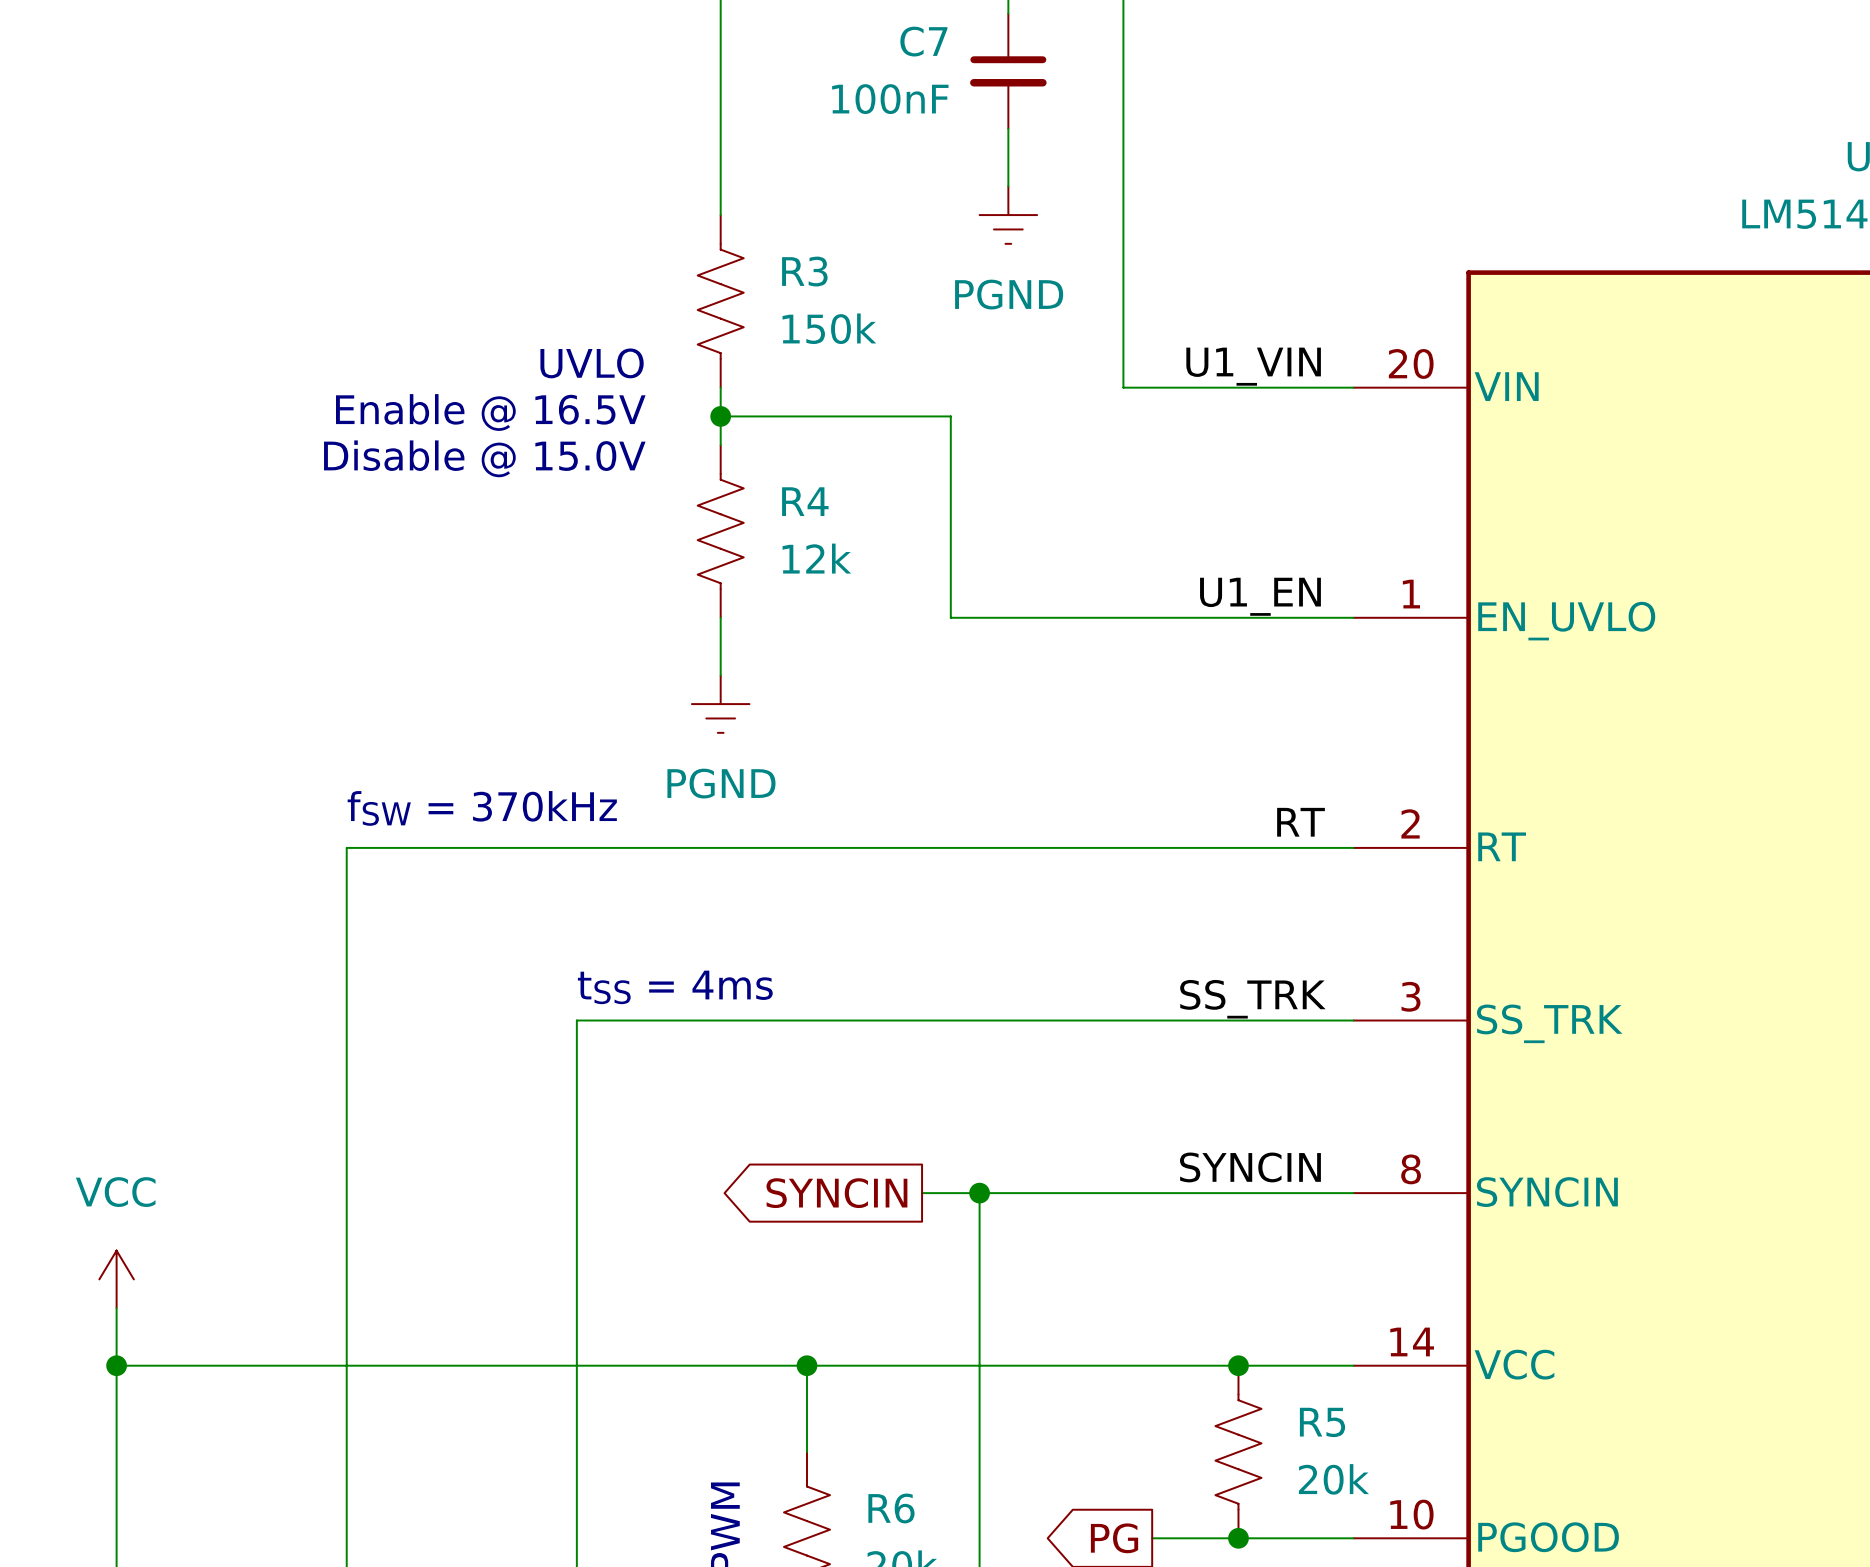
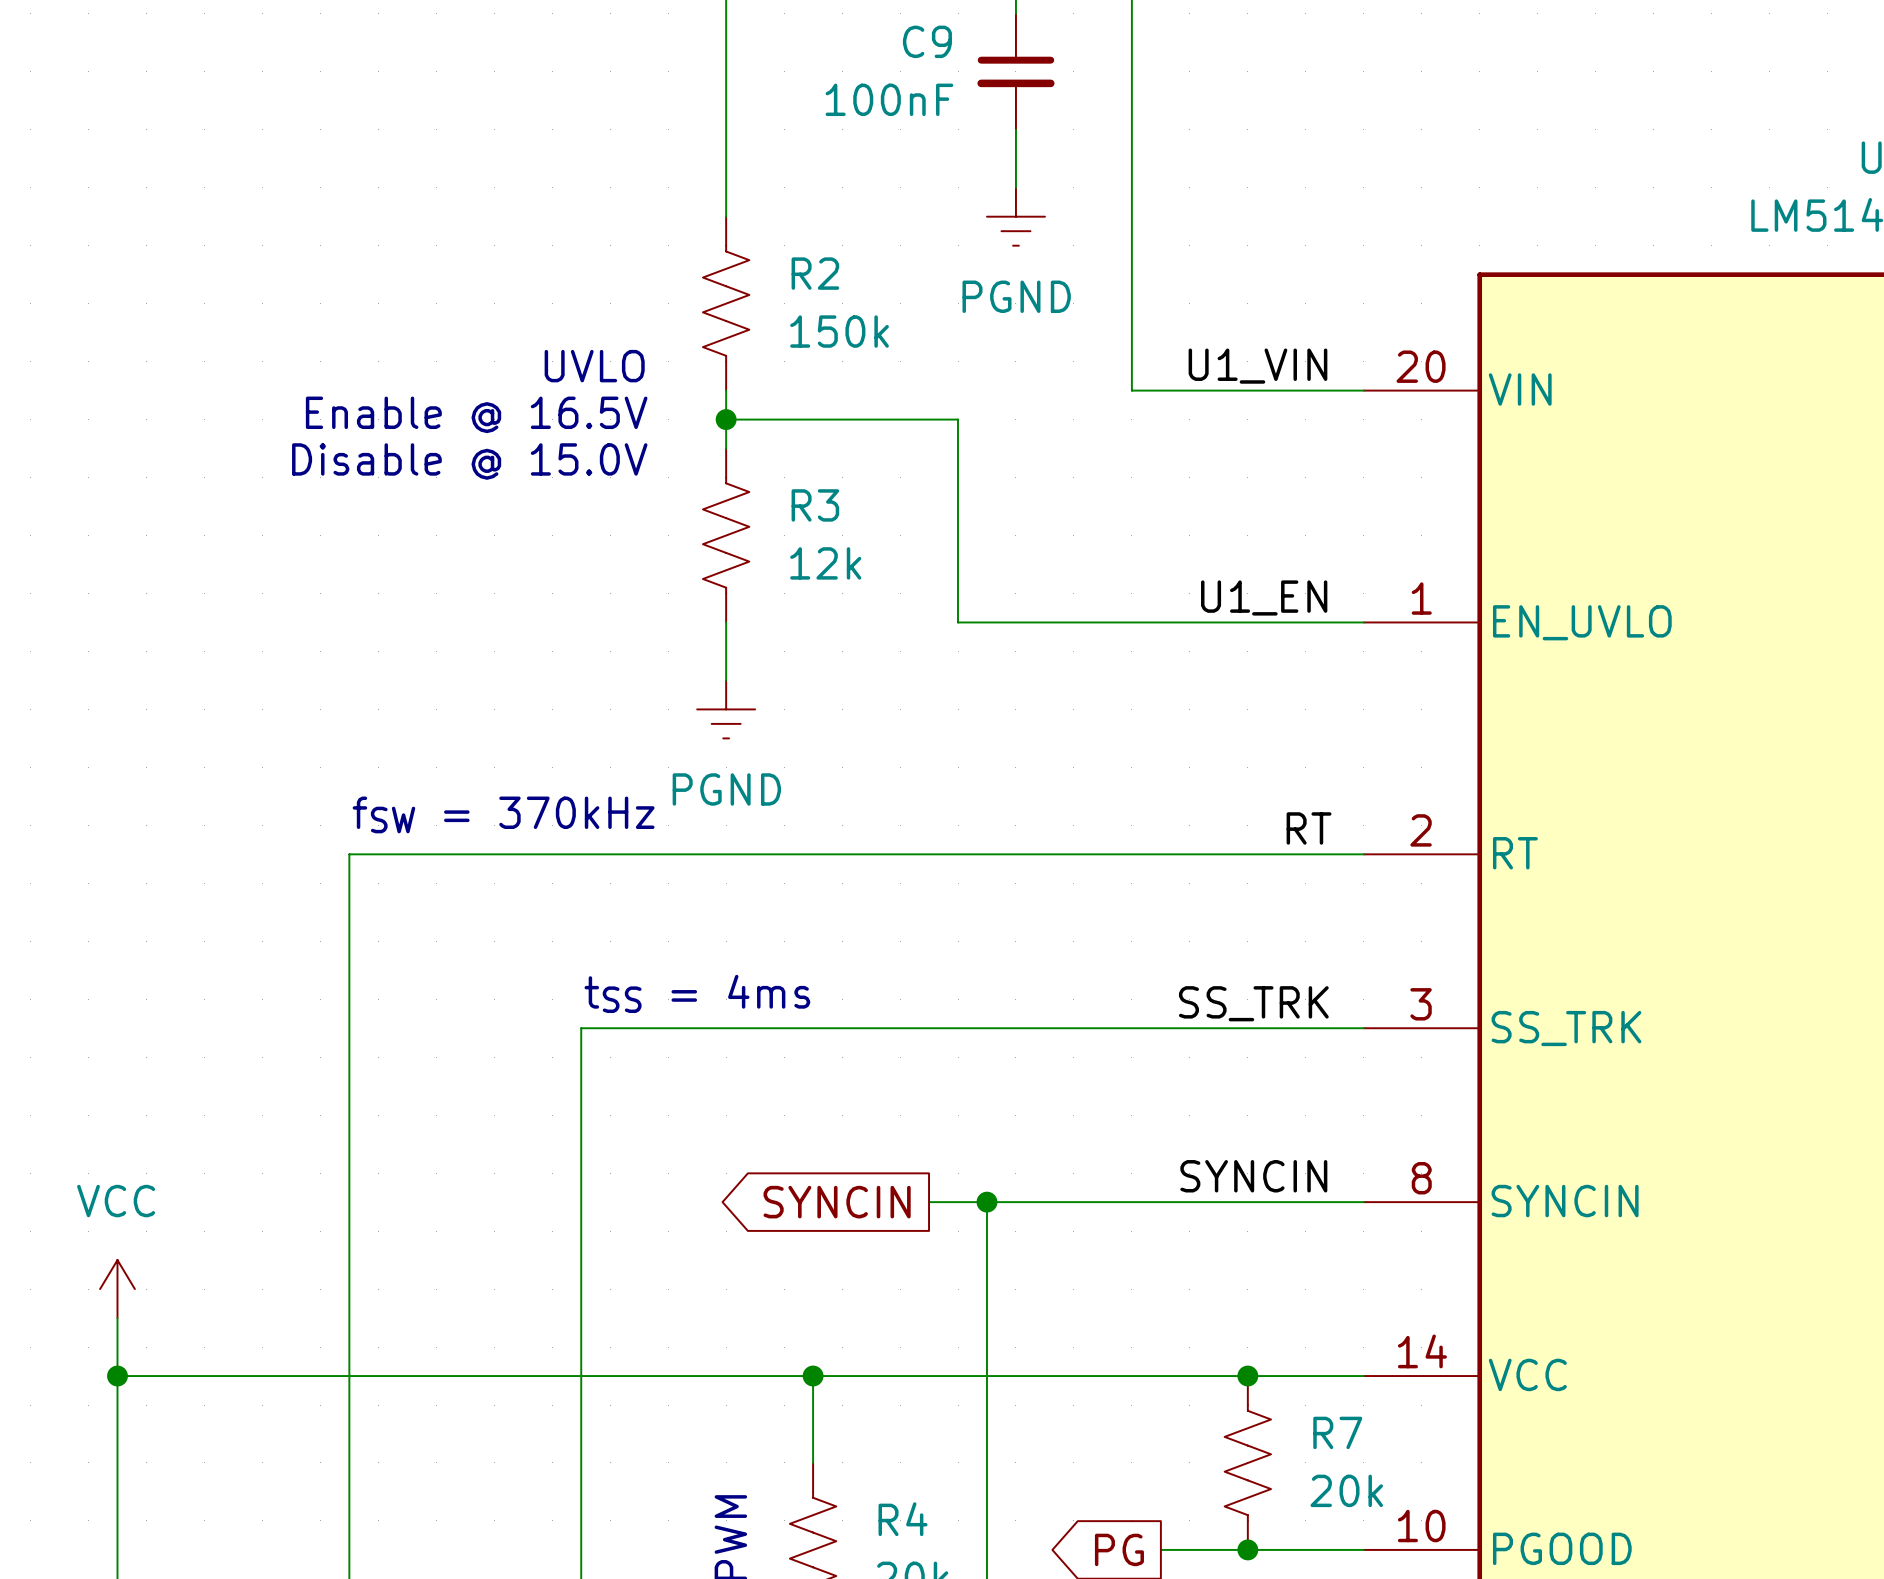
C7 name: C7 (923, 41) -> C9 (927, 41)
R3 name: R3 (804, 271) -> R2 (815, 273)
R4 name: R4 (805, 501) -> R3 (815, 505)
R5 name: R5 (1322, 1422) -> R7 (1337, 1432)
R6 name: R6 (891, 1508) -> R4 (903, 1519)

